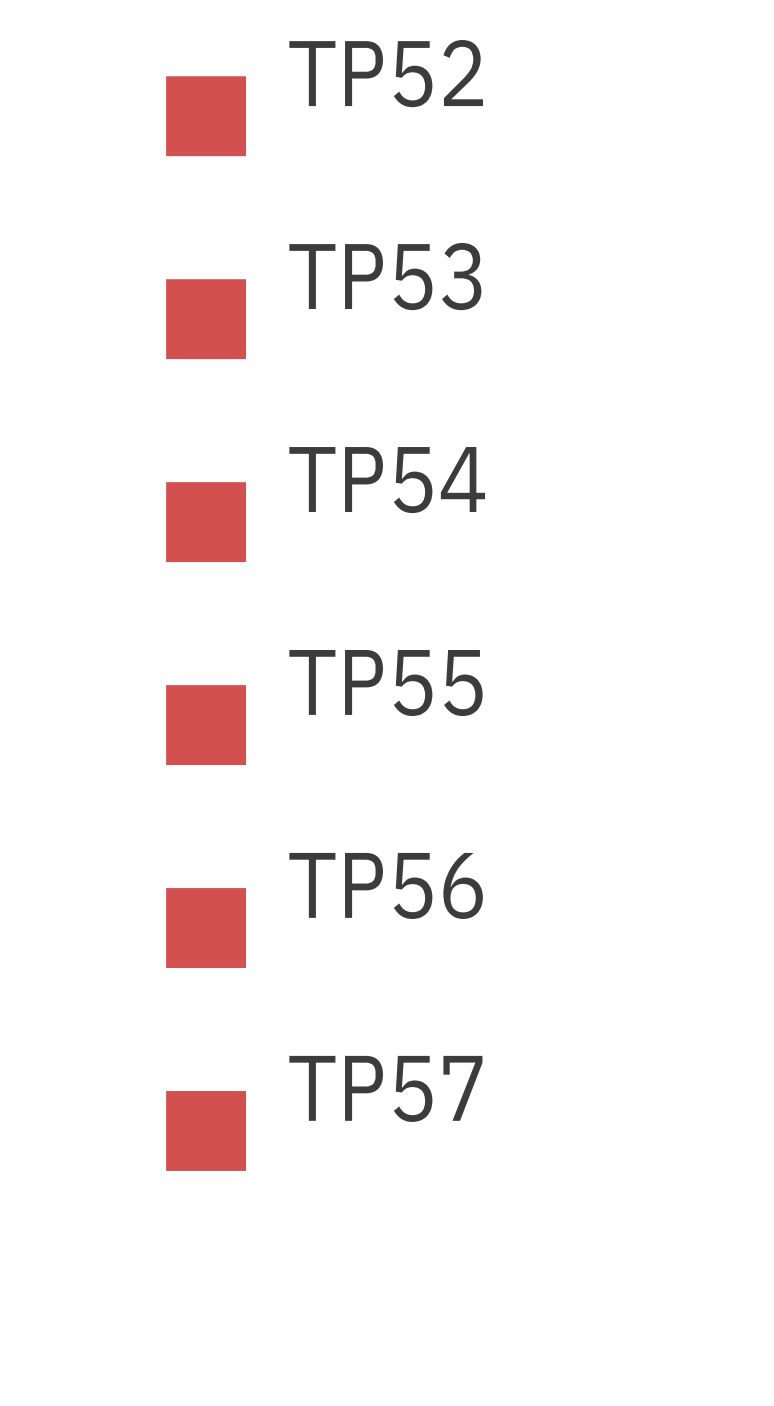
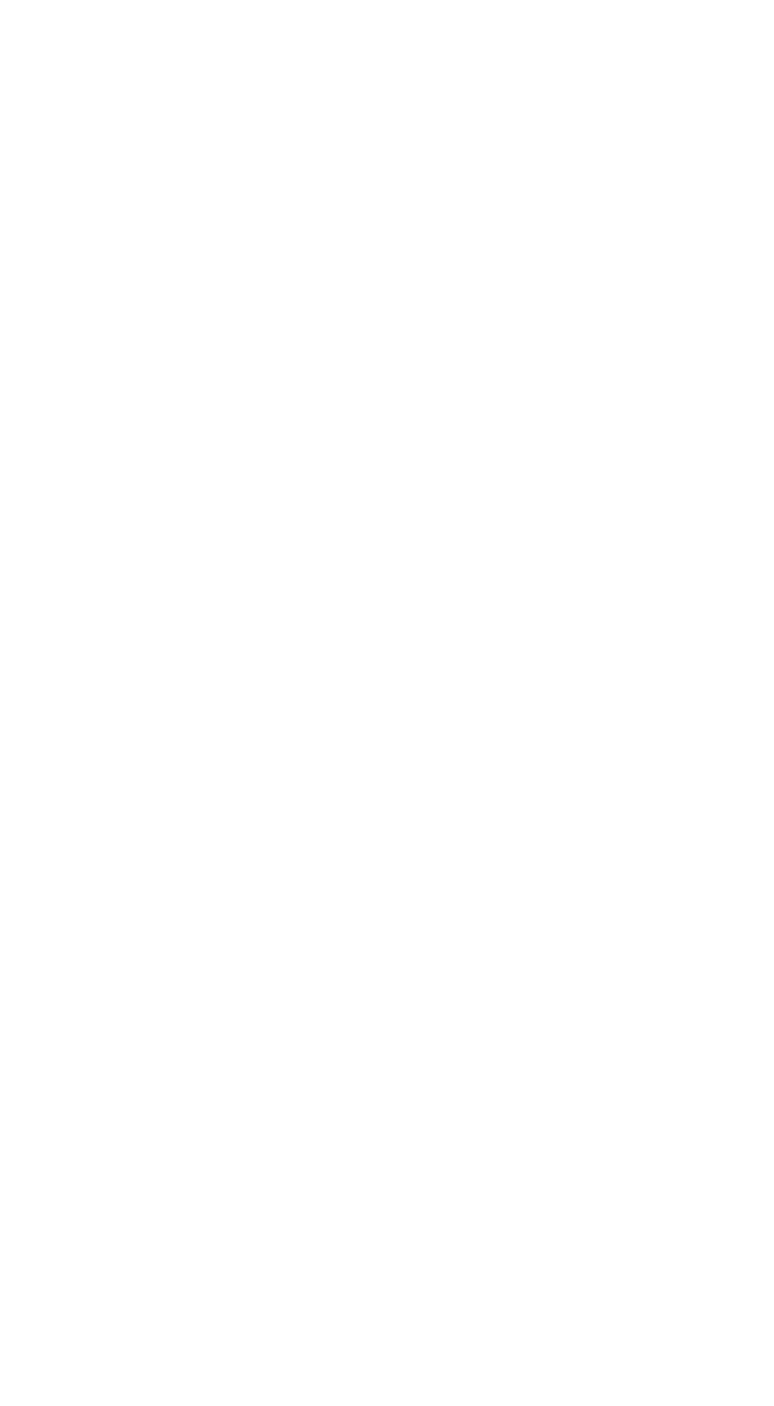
TP52: (206, 116) -> none
TP53: (206, 319) -> none
TP54: (206, 522) -> none
TP55: (206, 725) -> none
TP56: (206, 928) -> none
TP57: (206, 1130) -> none

